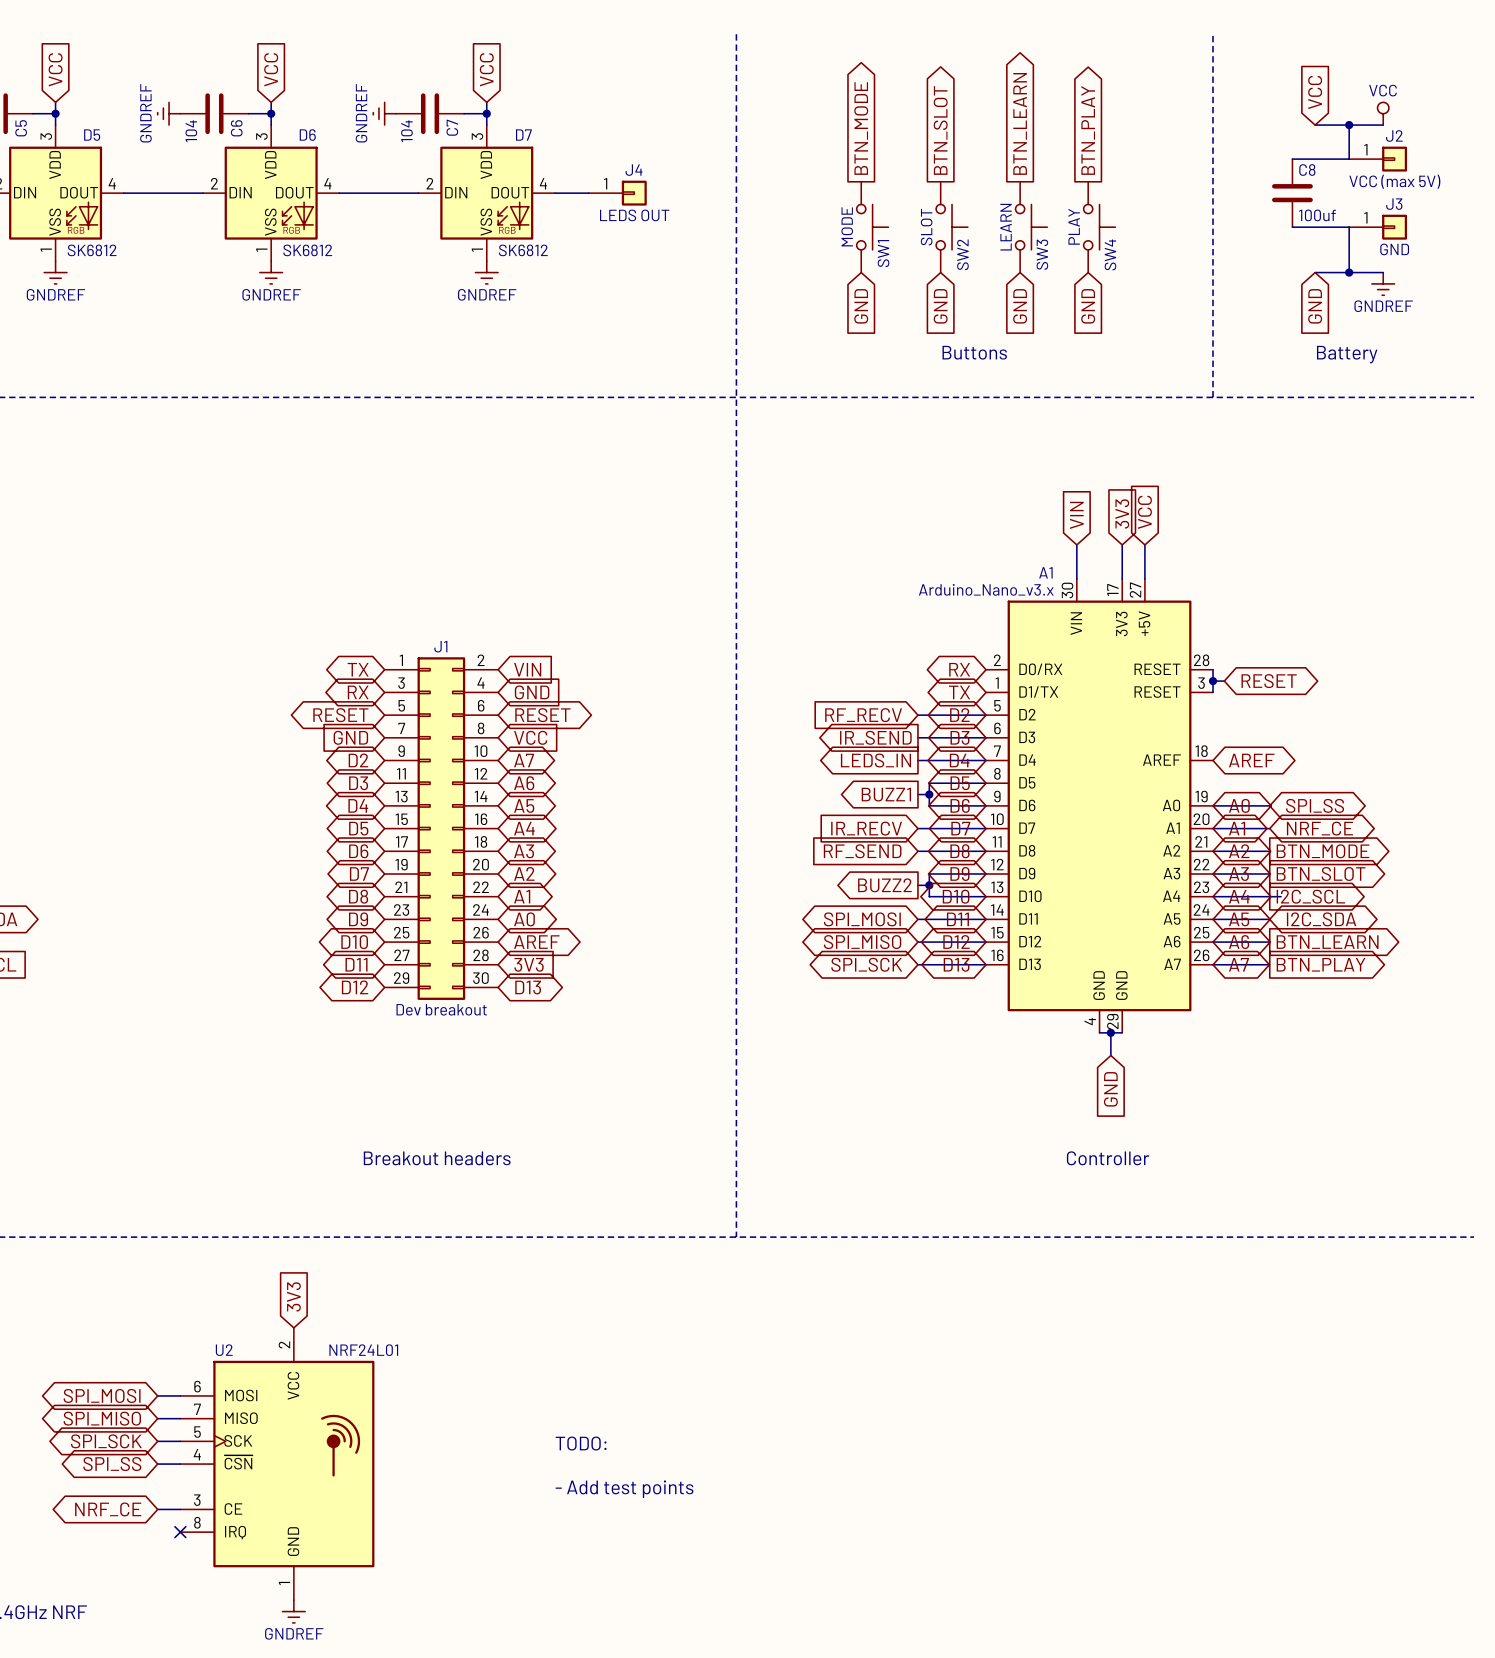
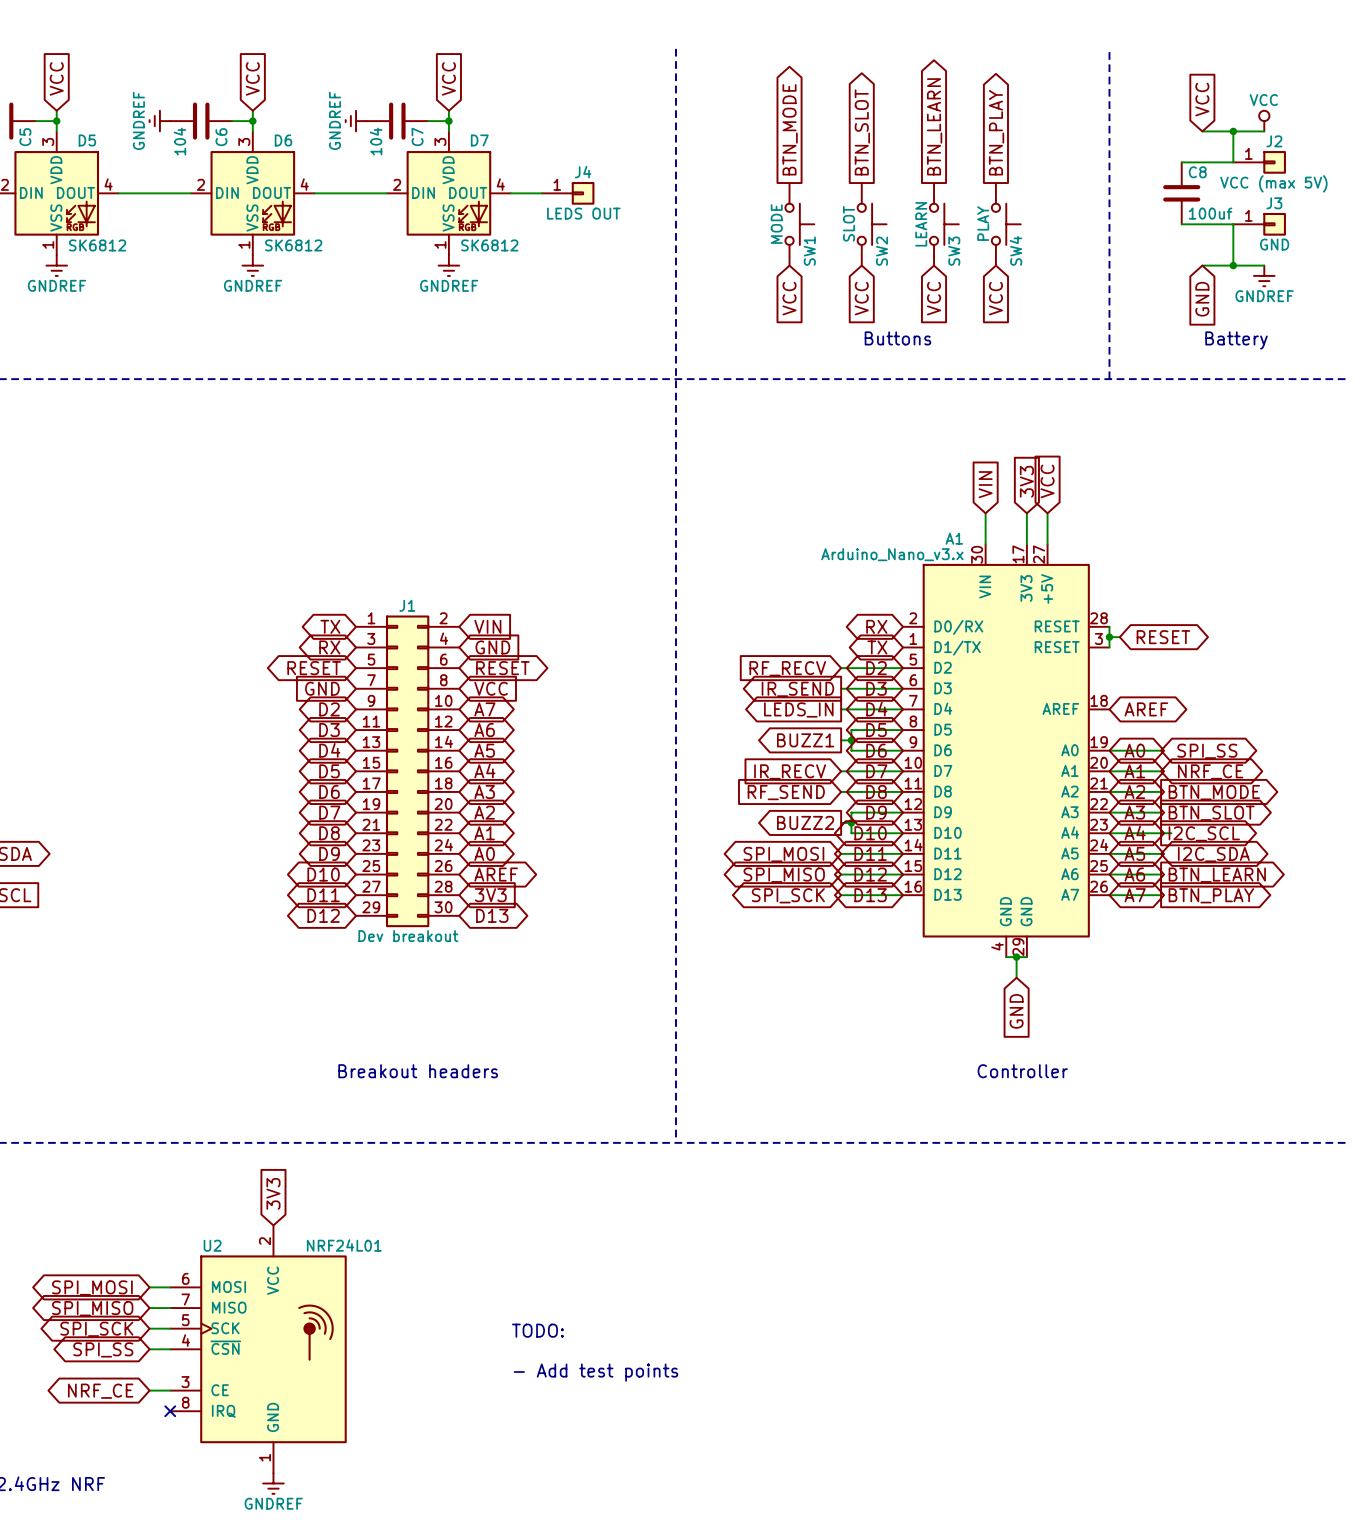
global label: GND (861, 306) -> VCC (789, 298)
global label: GND (940, 306) -> VCC (861, 298)
global label: GND (1020, 306) -> VCC (934, 298)
global label: GND (1088, 306) -> VCC (995, 298)

